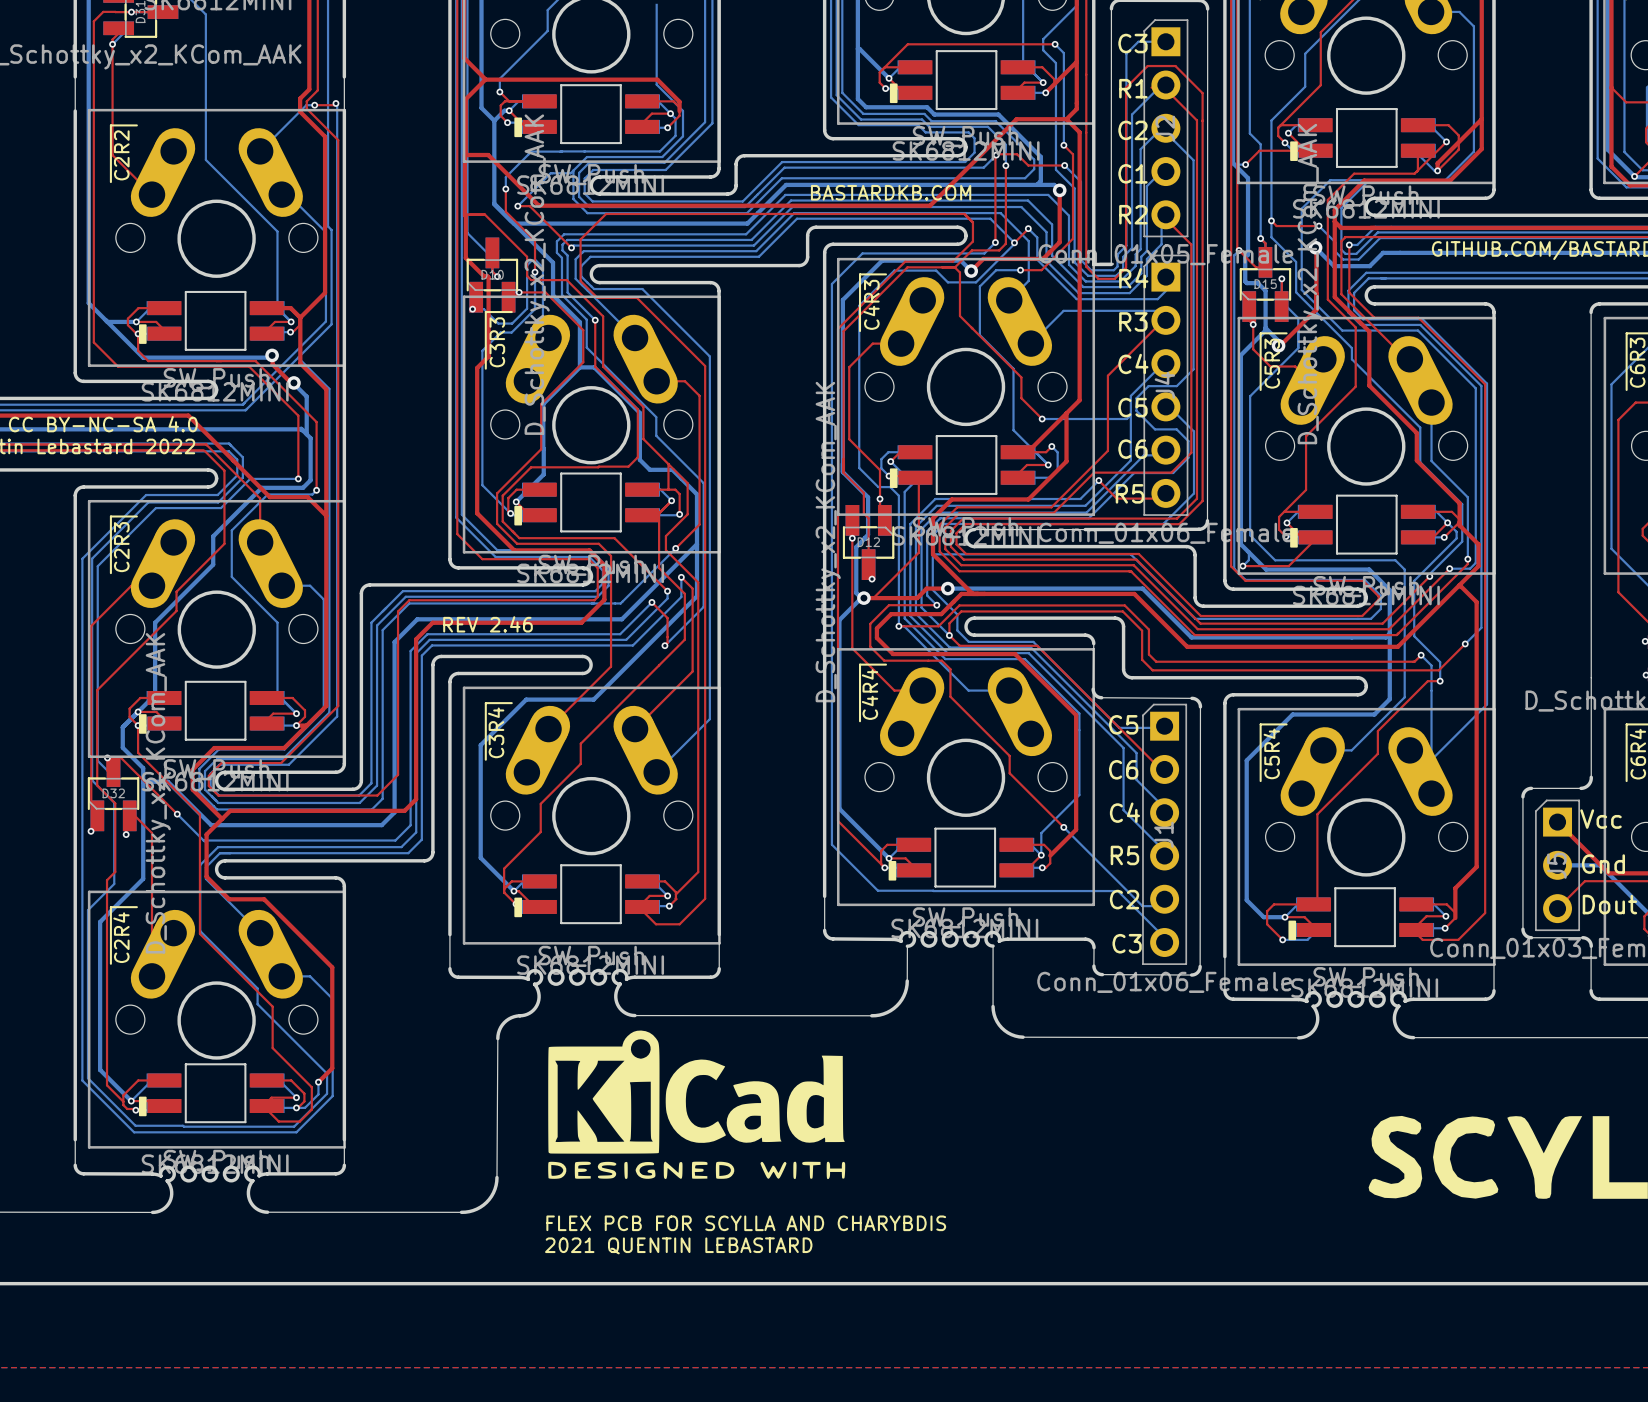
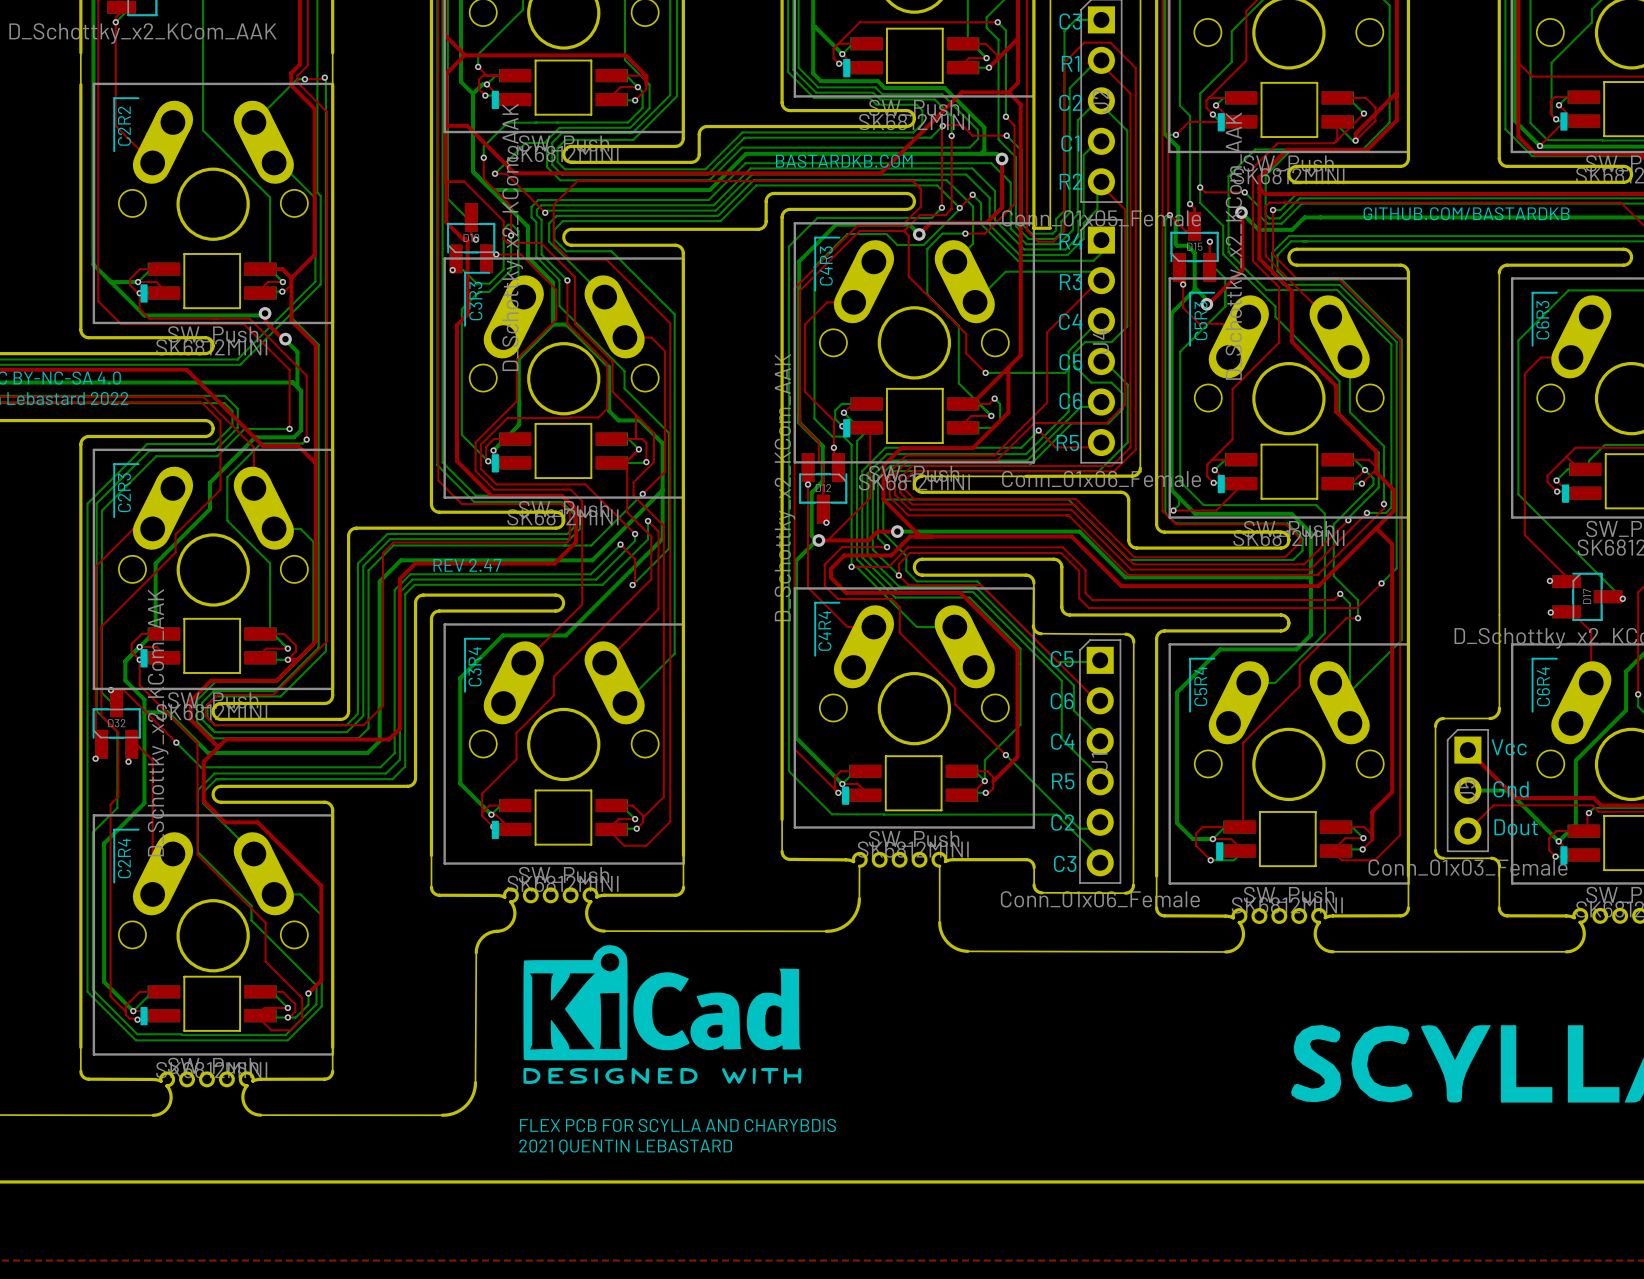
text: REV 2.46 (488, 624) -> REV 2.47 (467, 565)

